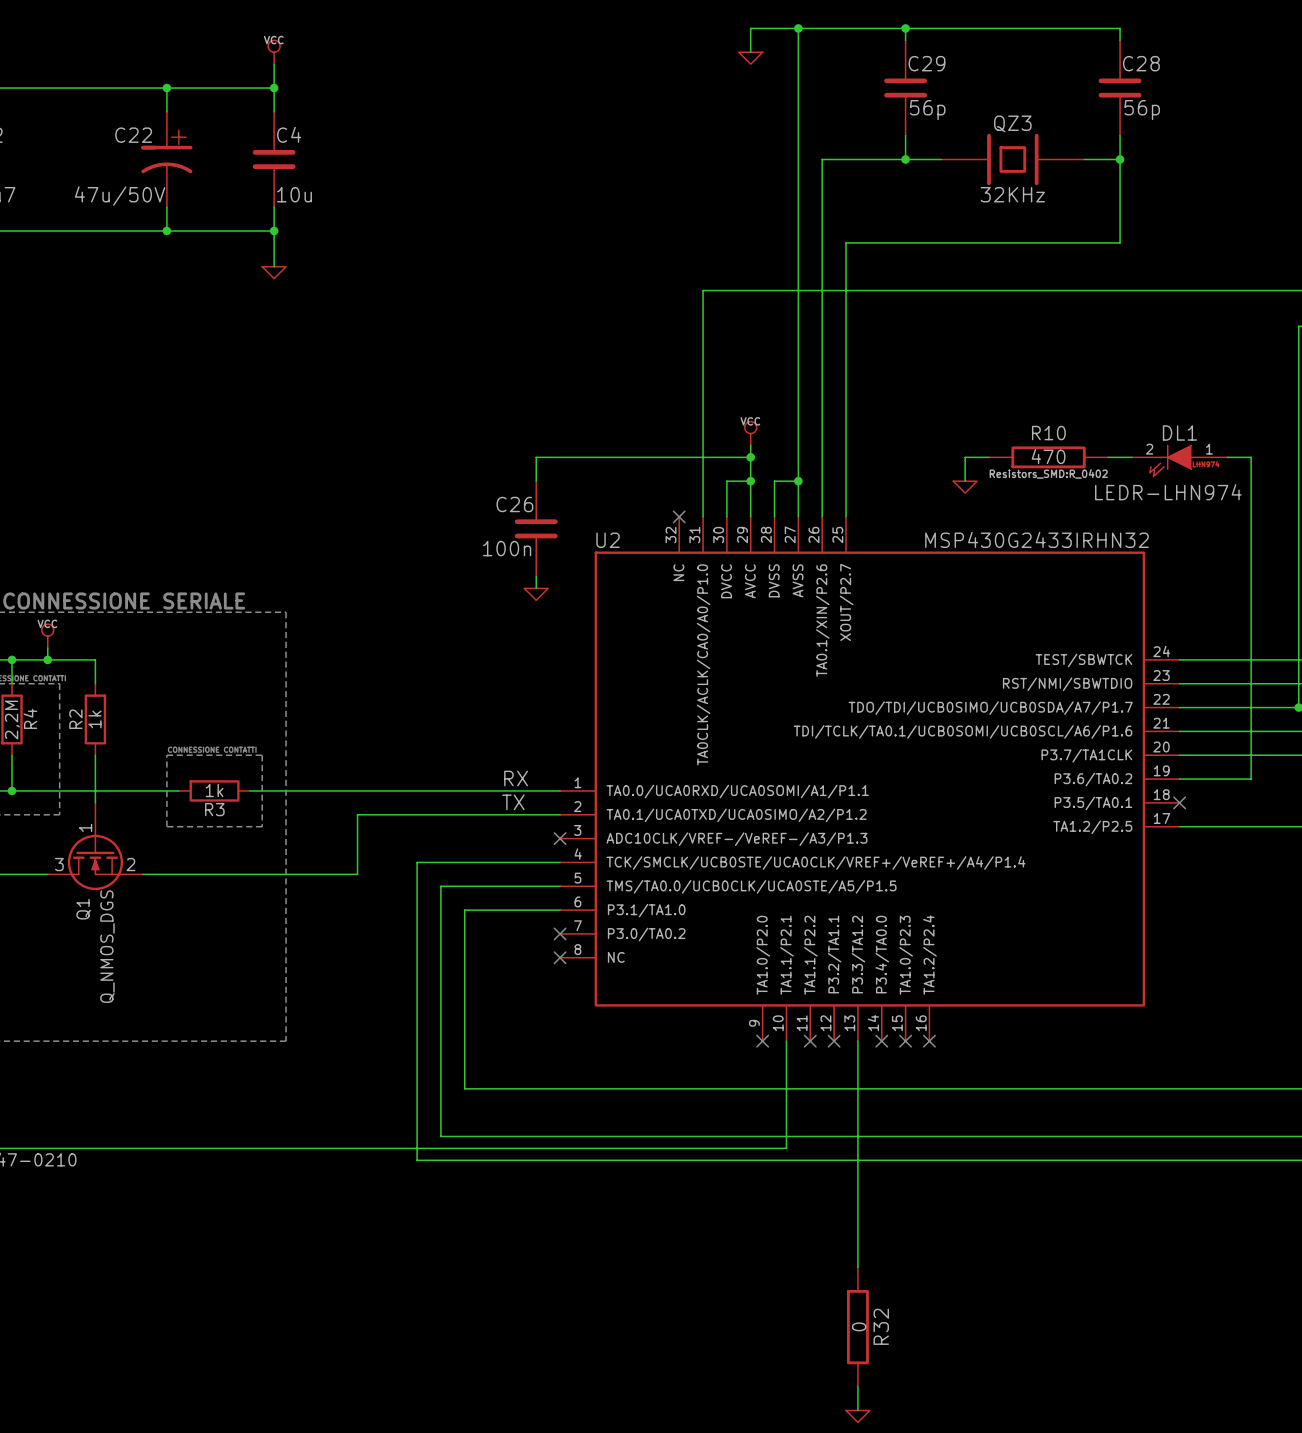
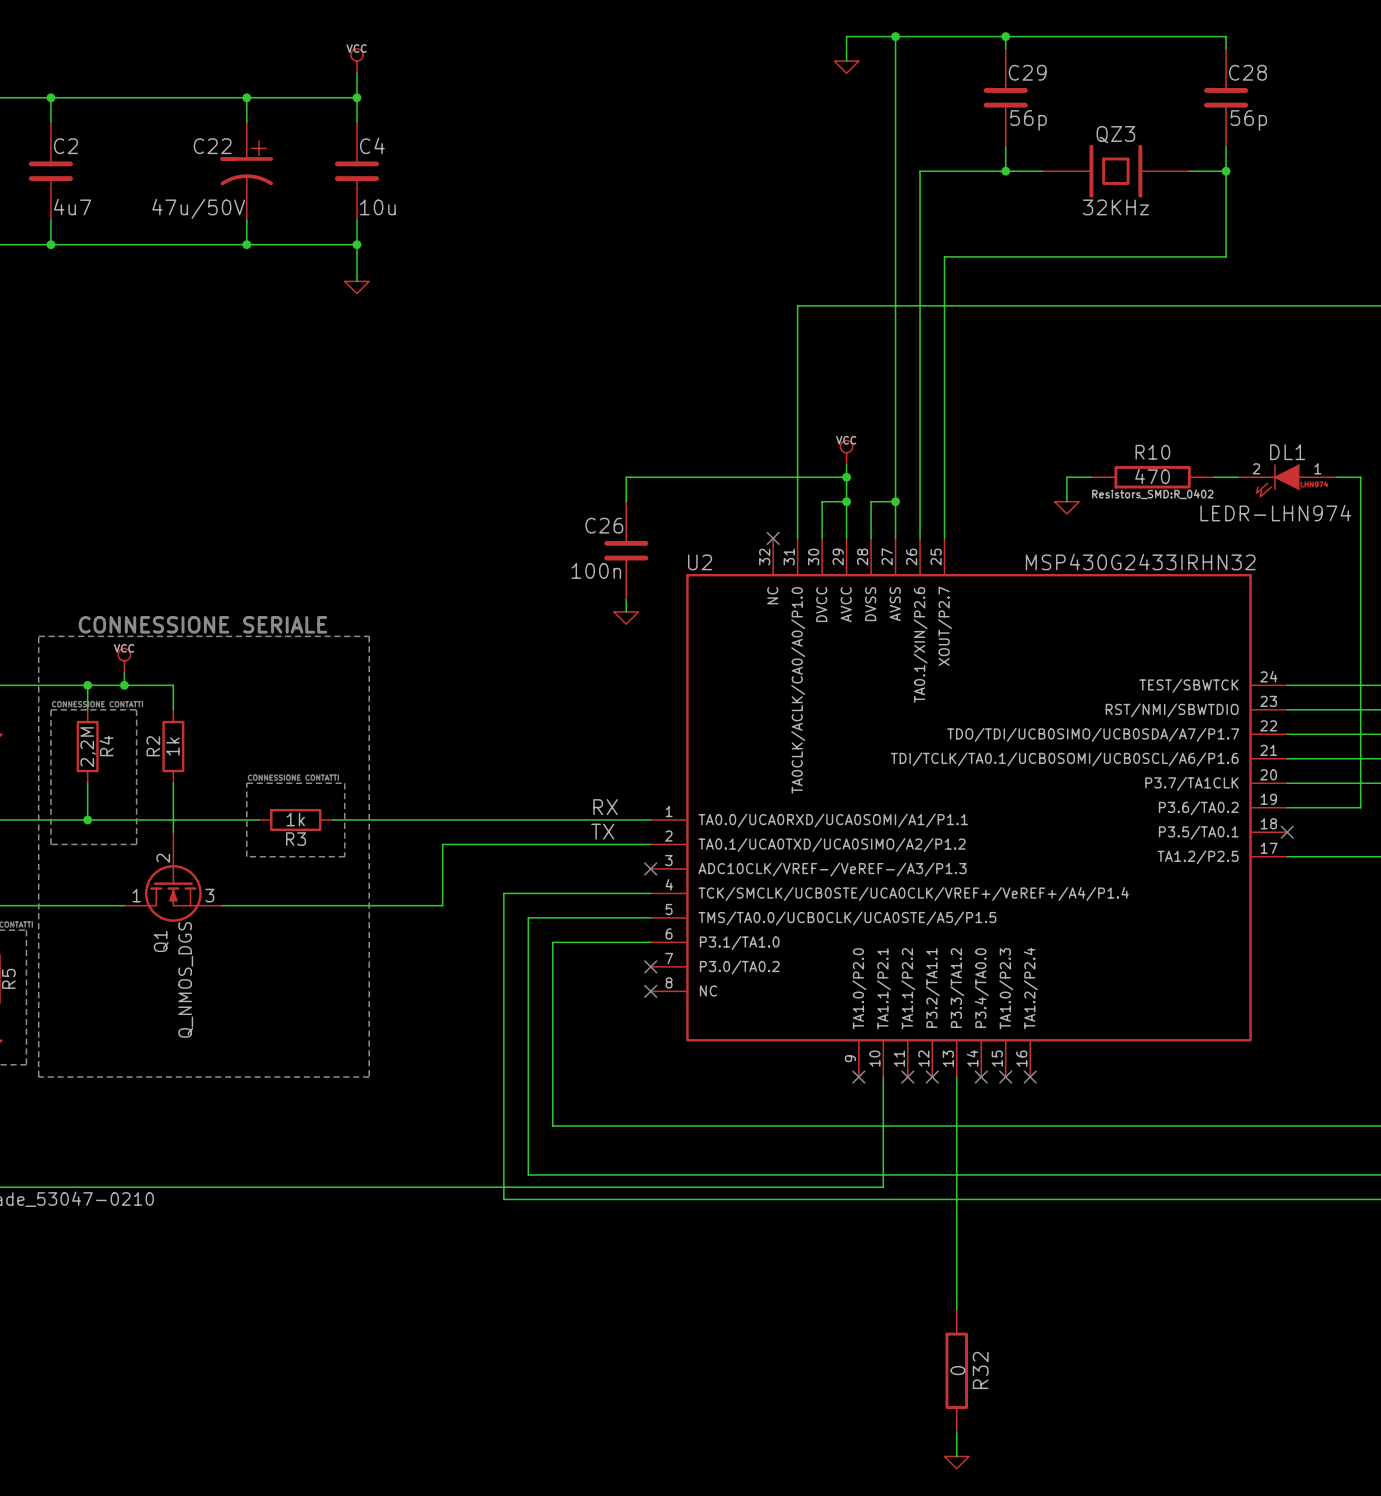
Q1 pin number: 1 (85, 827) -> 2 (163, 858)
Q1 pin number: 3 (59, 864) -> 1 (136, 895)
Q1 pin number: 2 (130, 864) -> 3 (209, 895)

